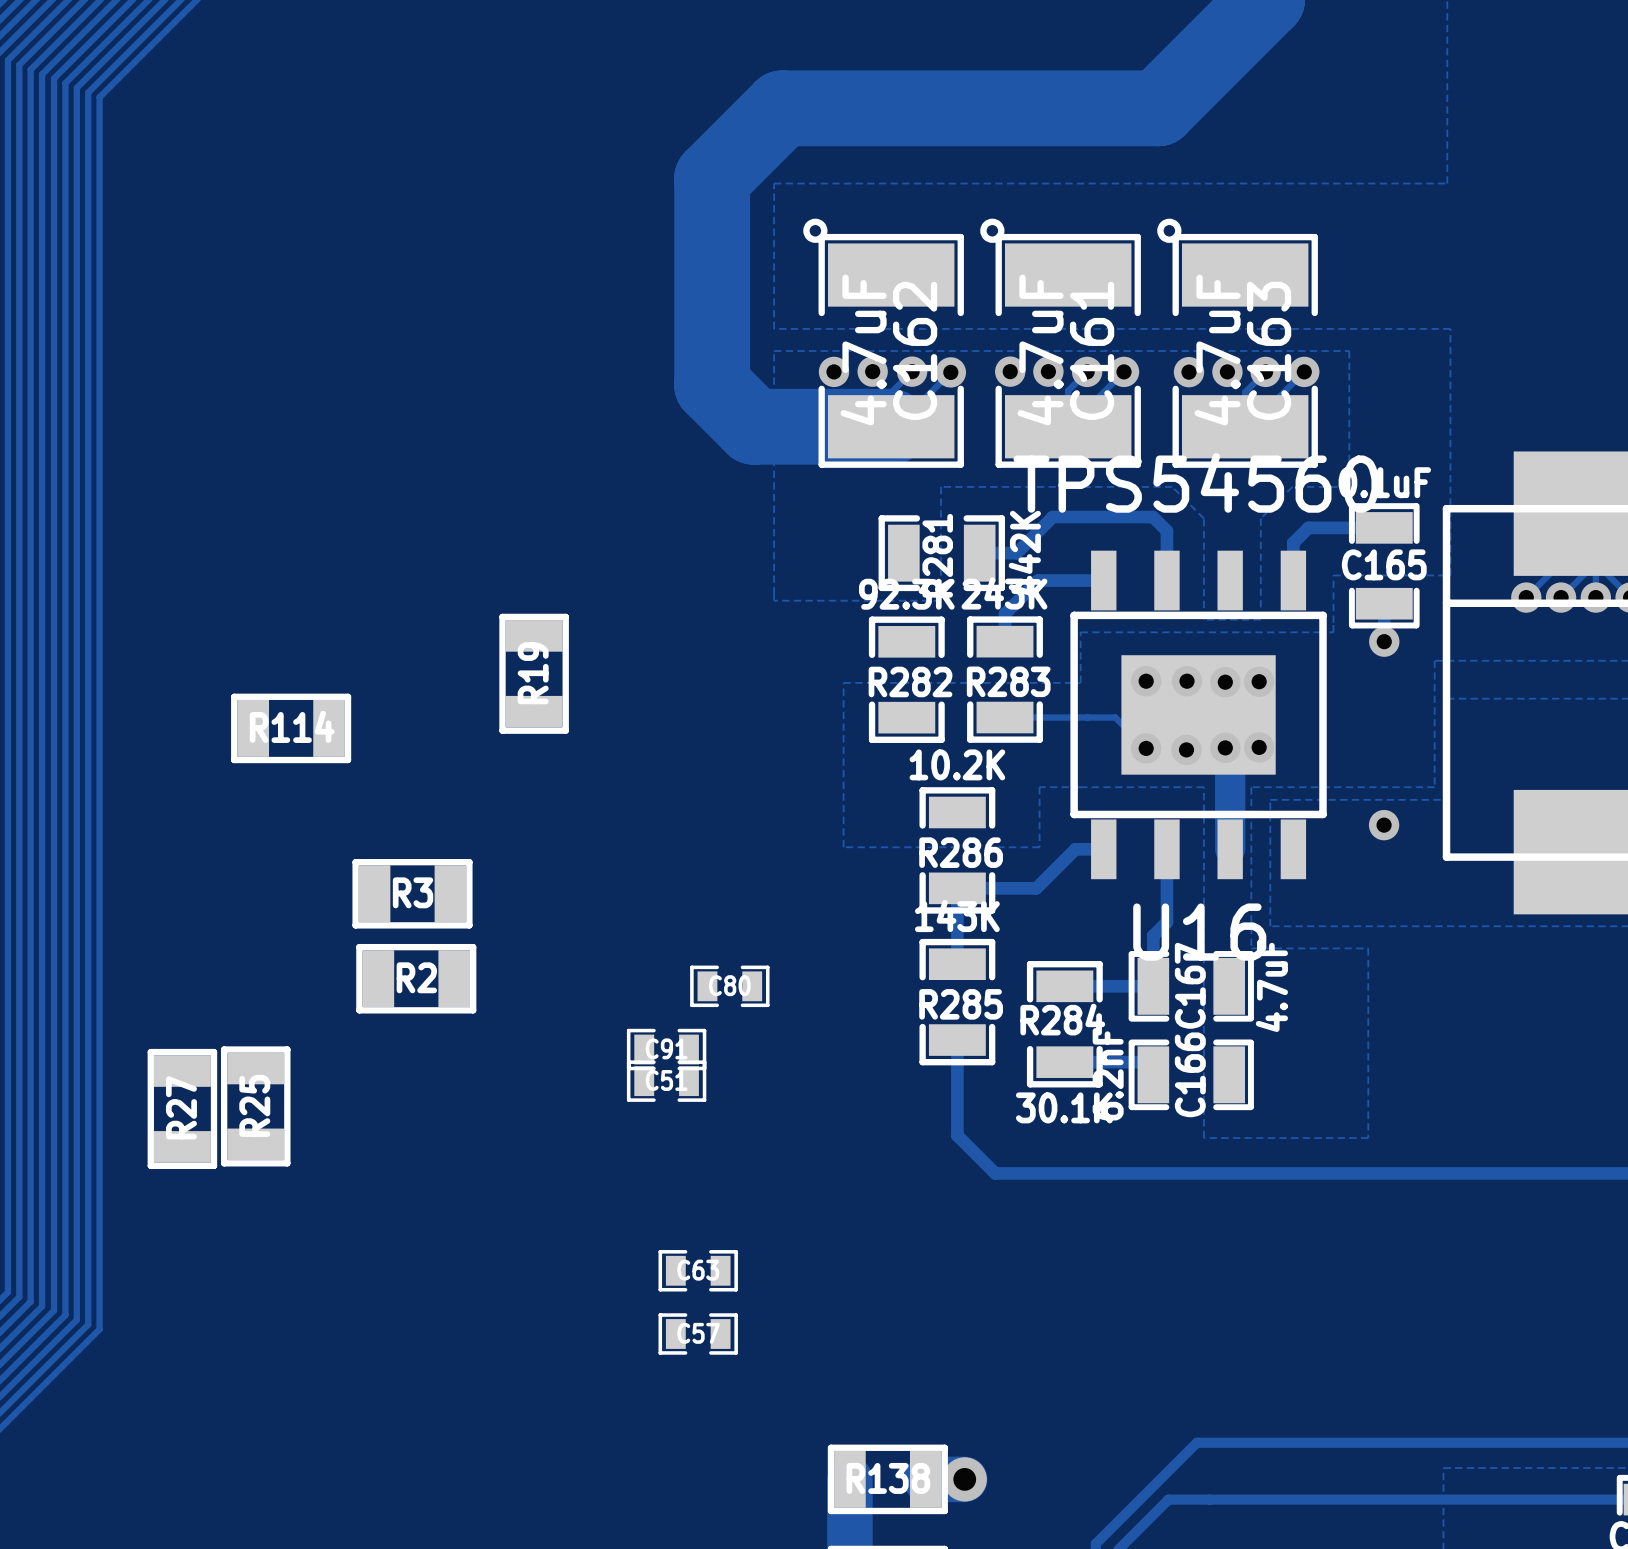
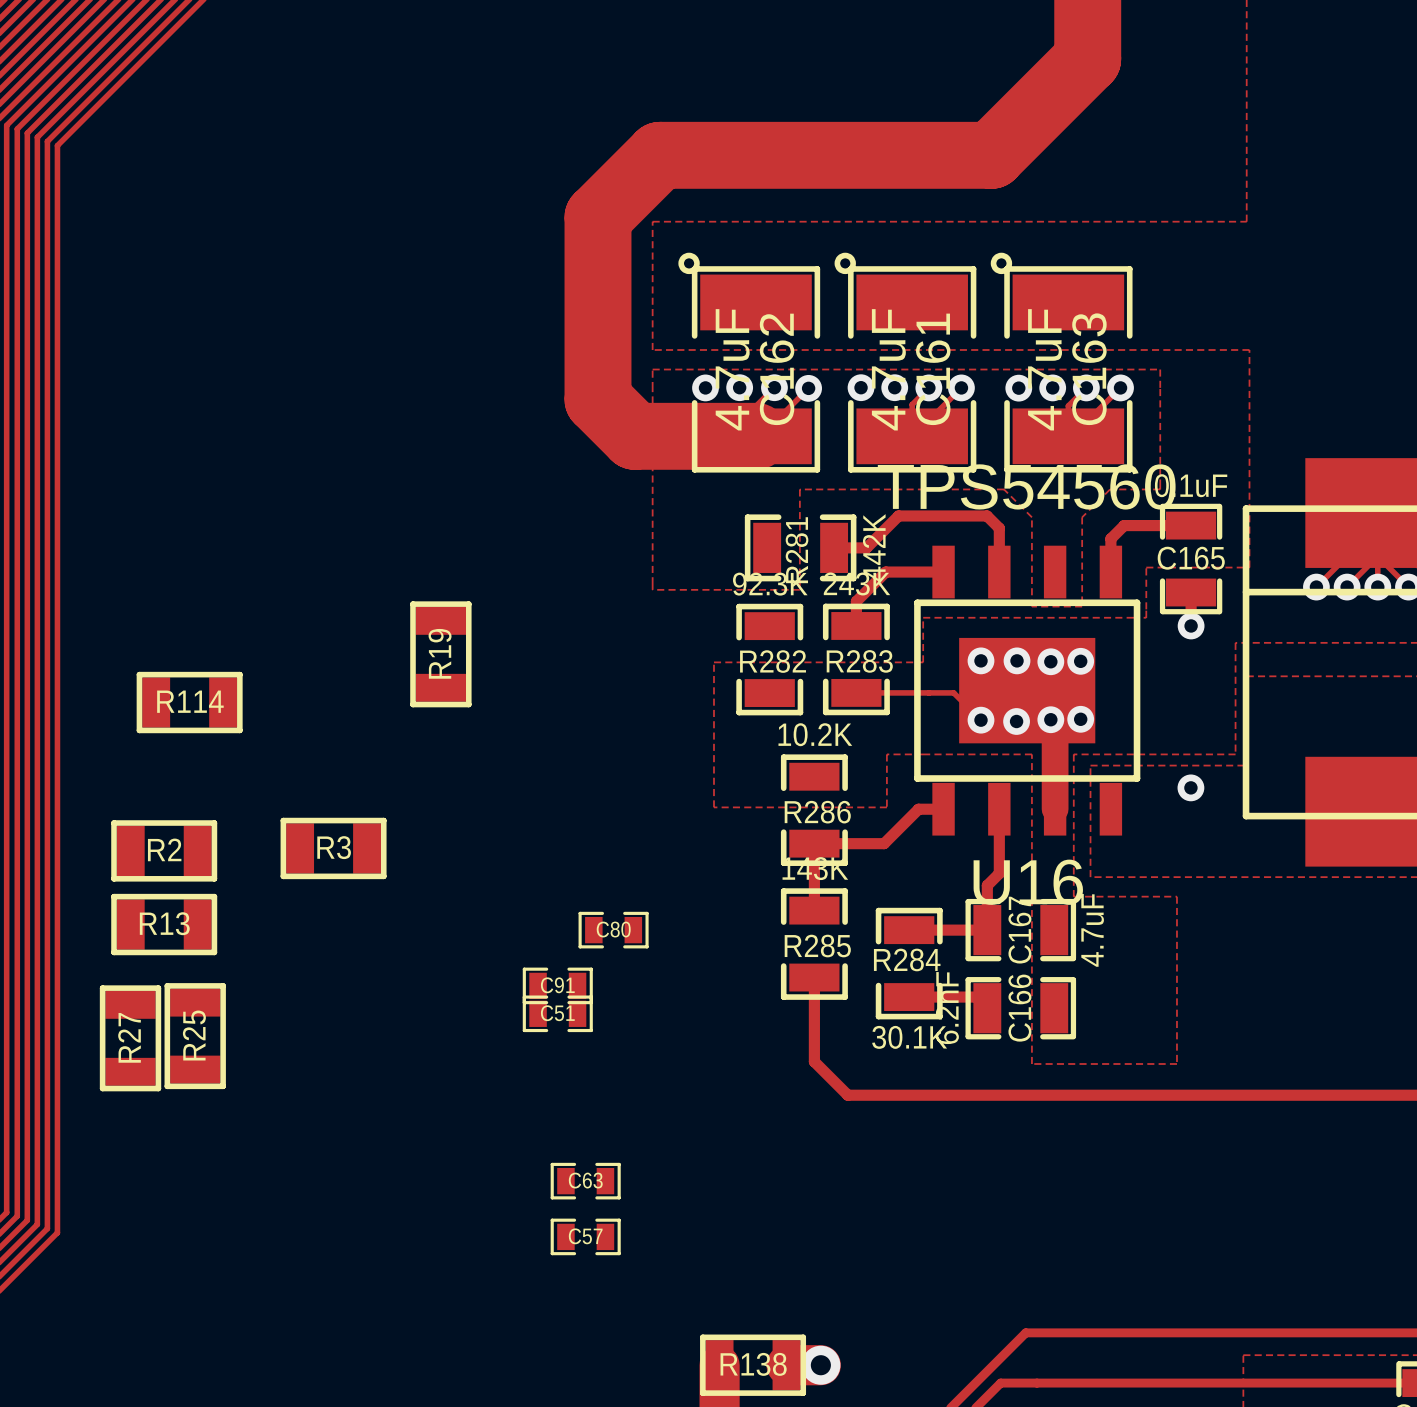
R114 position: (291, 728) -> (189, 702)
R2 position: (416, 978) -> (164, 850)
R13: none -> (164, 924)

